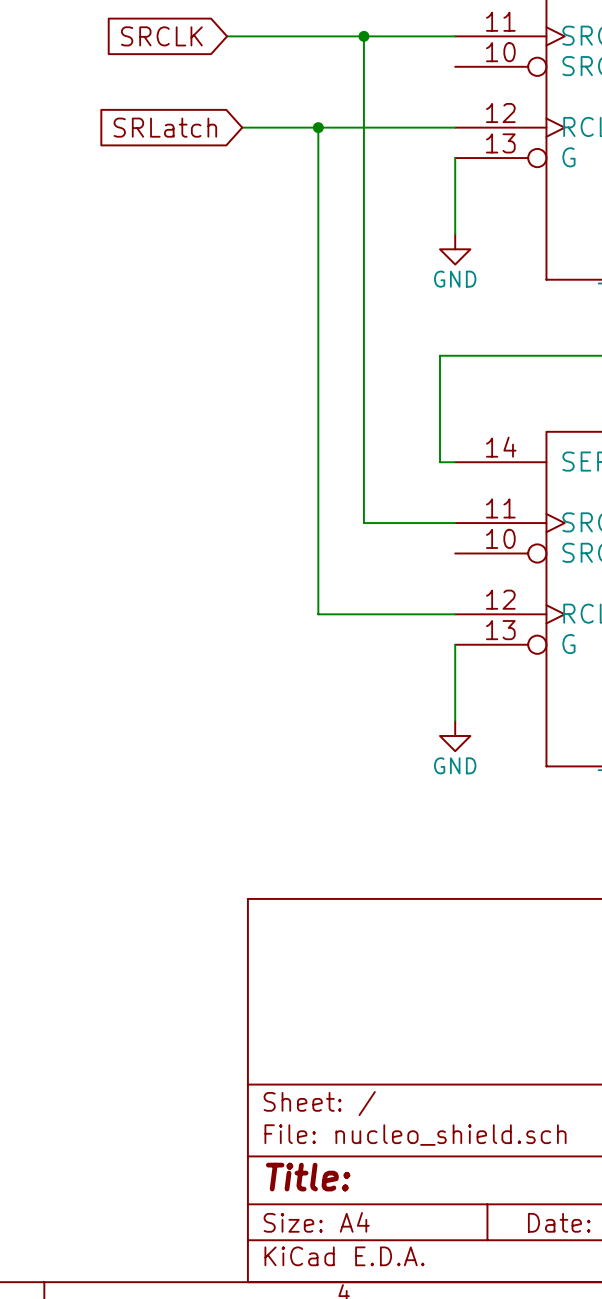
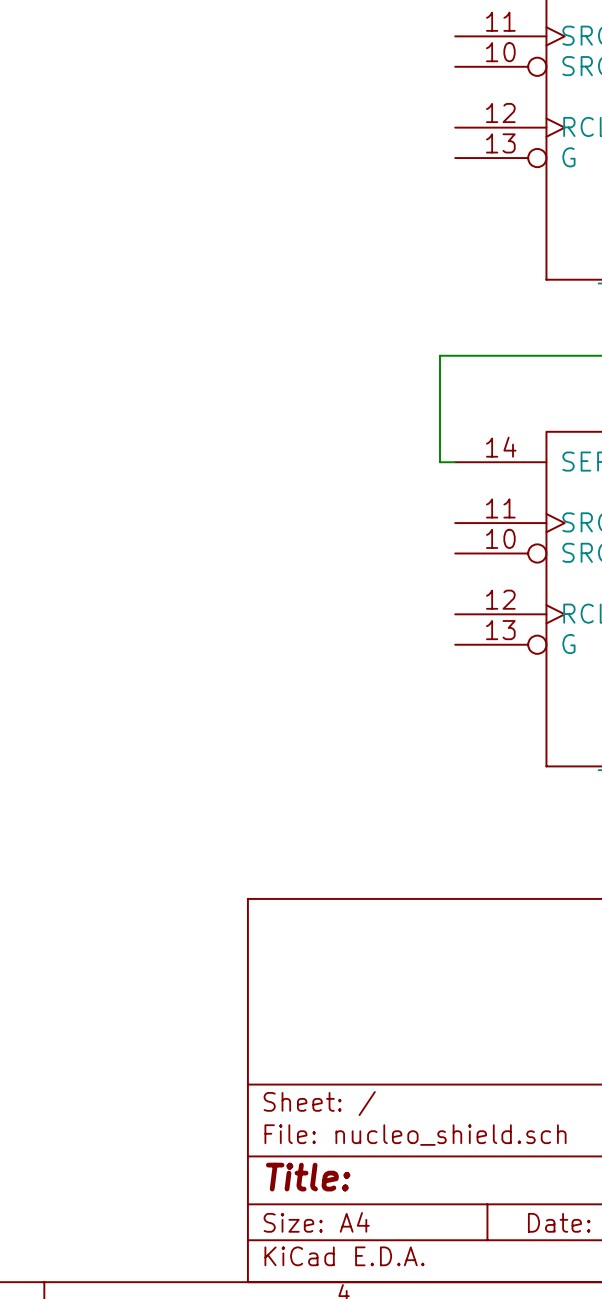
global label: SRCLK (161, 36) -> none
wire: (227, 36) (455, 36) -> none
wire: (363, 36) (363, 523) (455, 523) -> none
junction: (363, 36) -> none
global label: SRLatch (165, 127) -> none
wire: (242, 127) (455, 127) -> none
wire: (318, 127) (318, 614) (455, 614) -> none
junction: (318, 127) -> none
wire: (455, 158) (455, 234) -> none
power symbol: GND (455, 249) -> none
wire: (455, 644) (455, 720) -> none
power symbol: GND (455, 735) -> none

